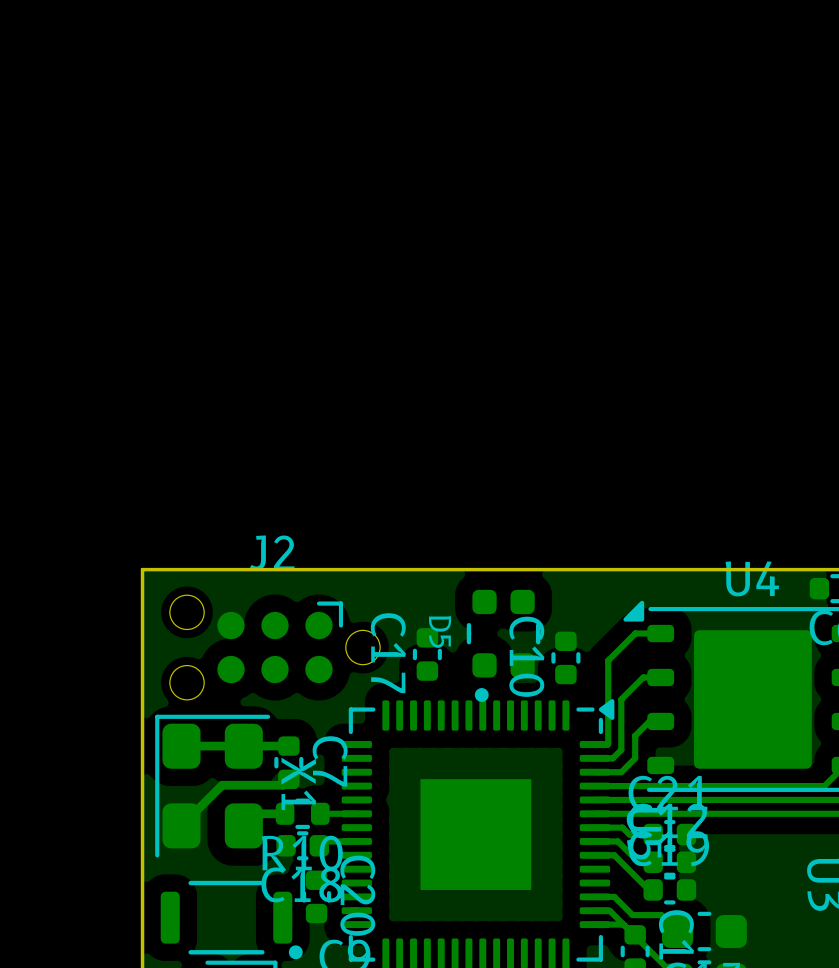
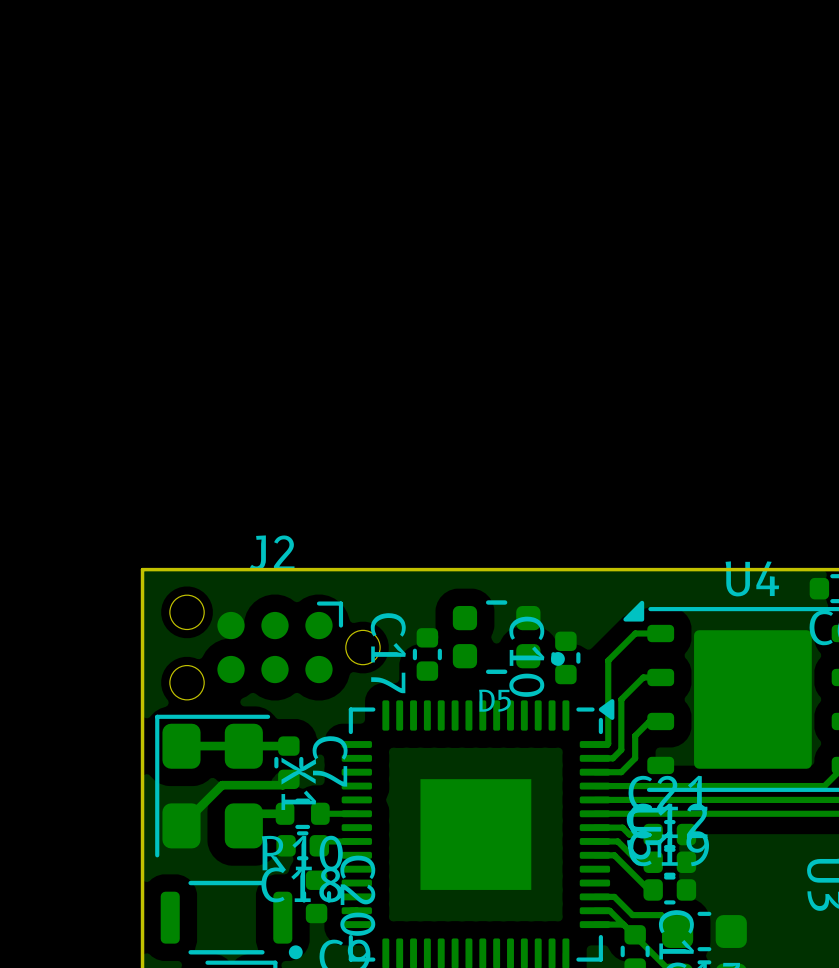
D5 rotation: 0° (503, 645) -> 90° counterclockwise (508, 637)

